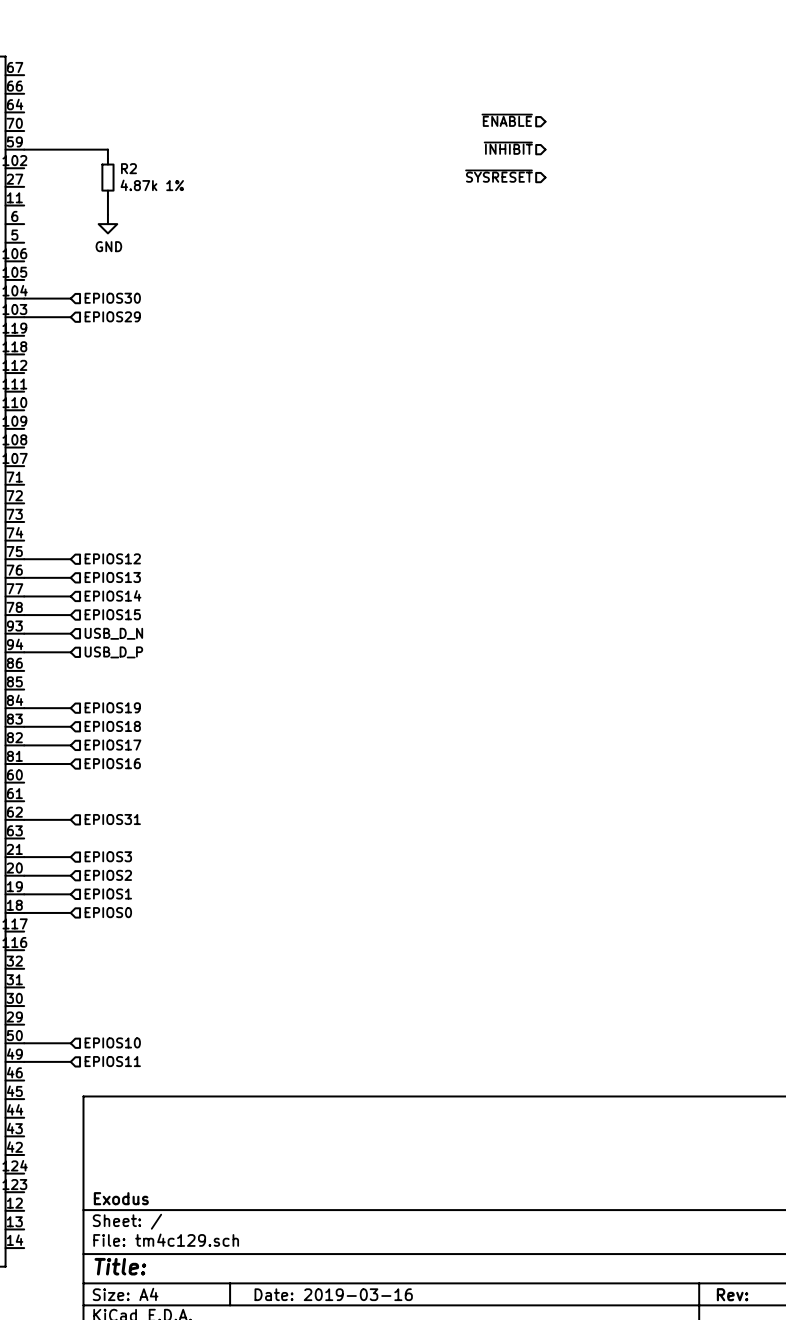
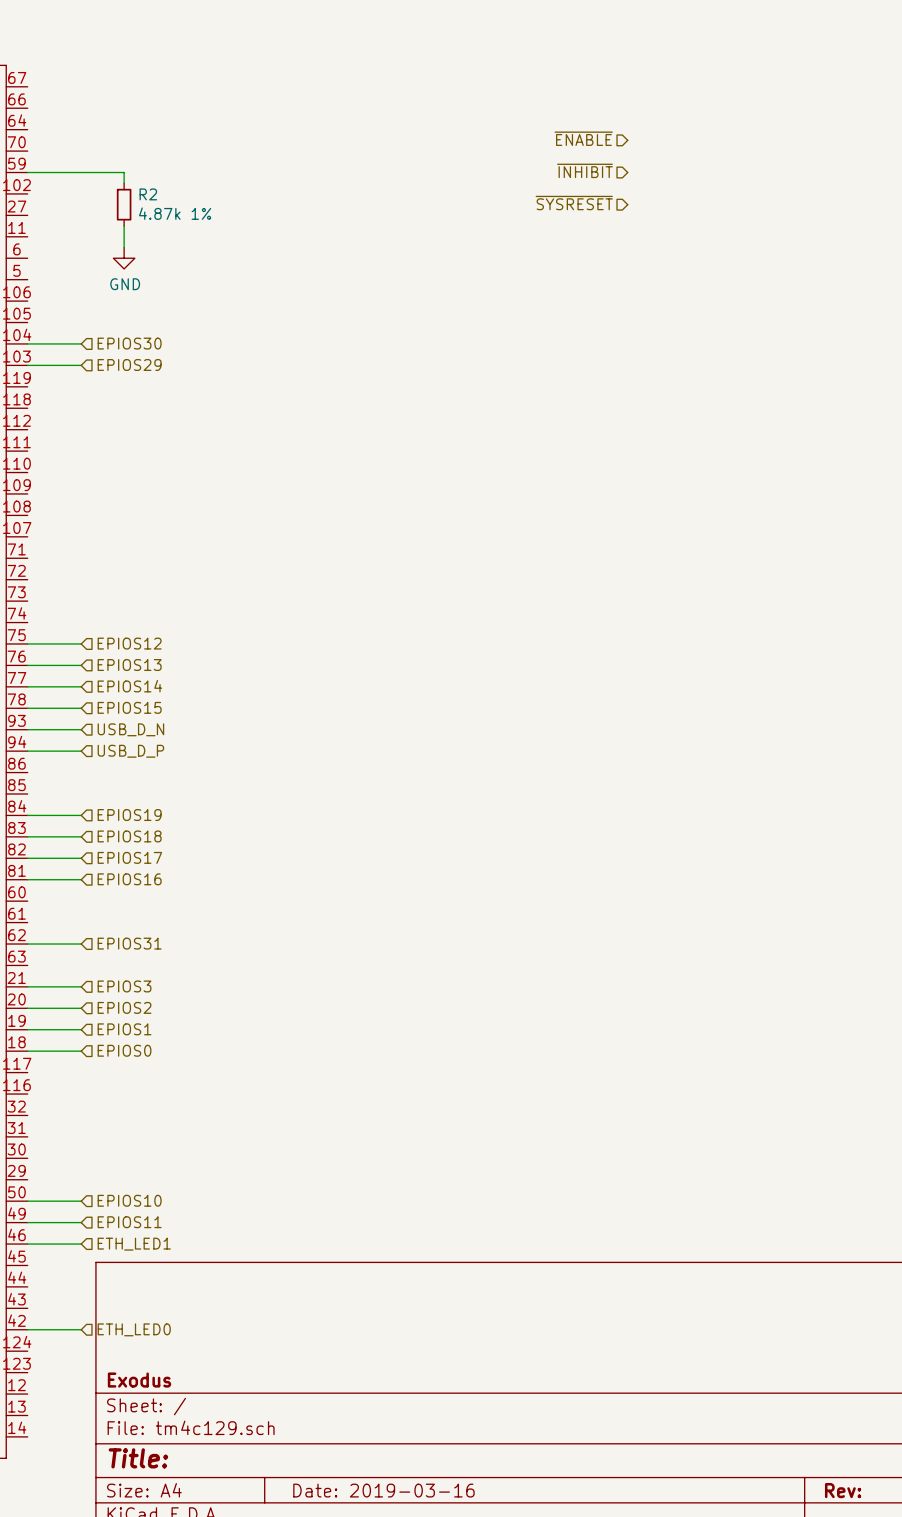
wire: none -> (27, 1244) (81, 1244)
hierarchical label: none -> ETH_LED1 (134, 1244)
wire: none -> (27, 1329) (81, 1329)
hierarchical label: none -> ETH_LED0 (134, 1329)

